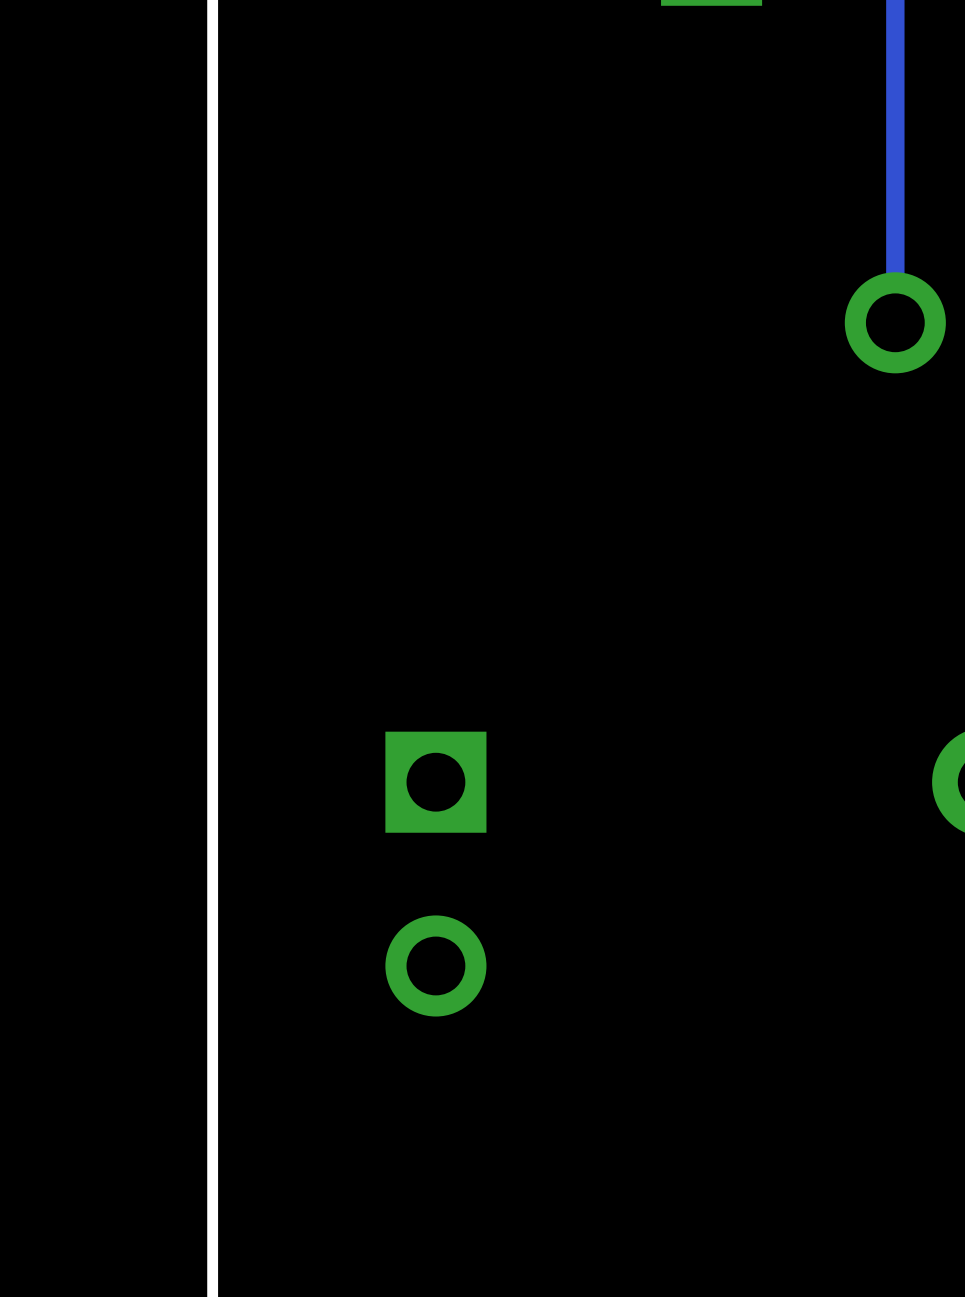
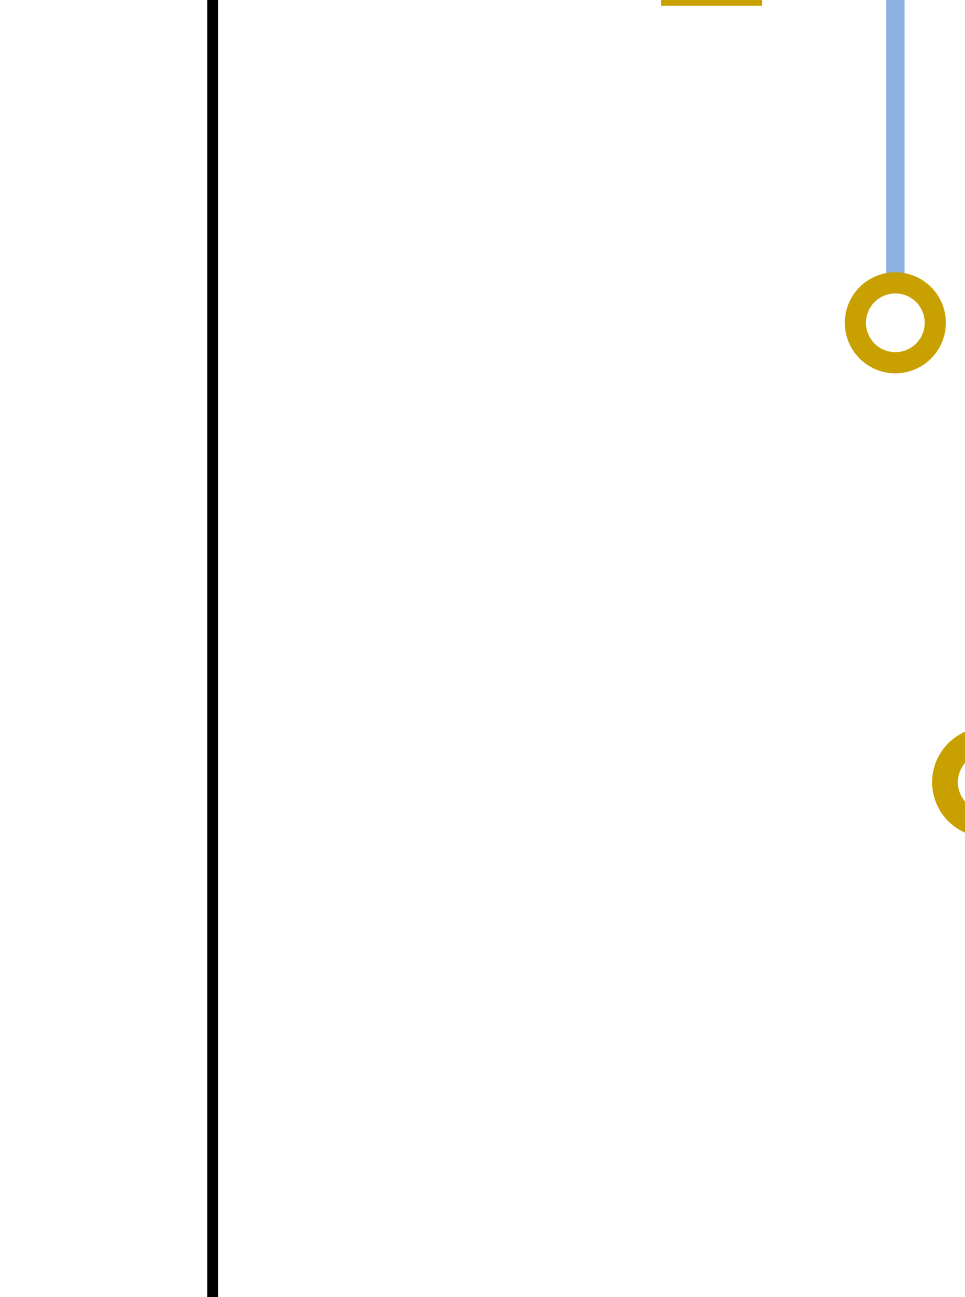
part: (435, 874) -> none

